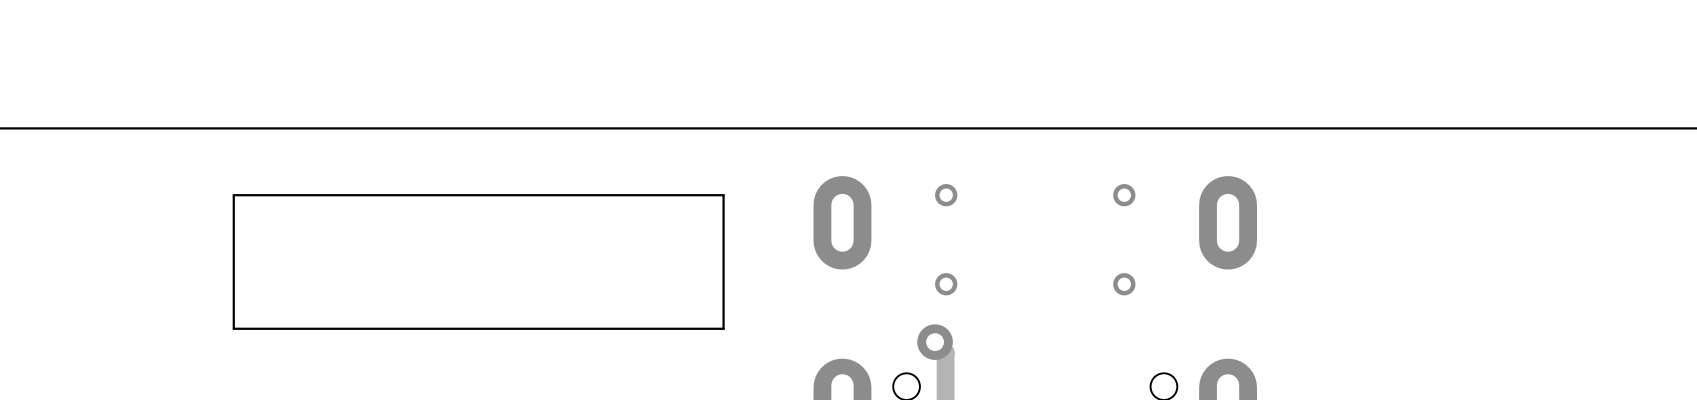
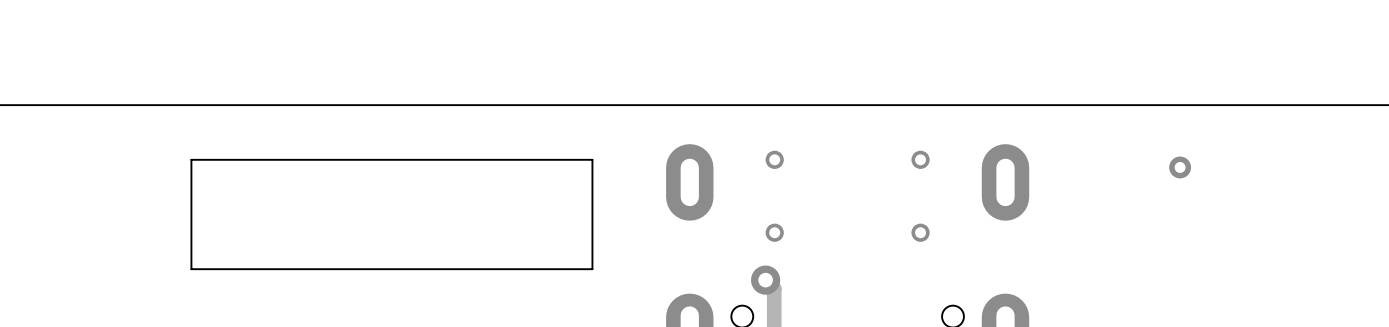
via: none -> (1180, 167)

